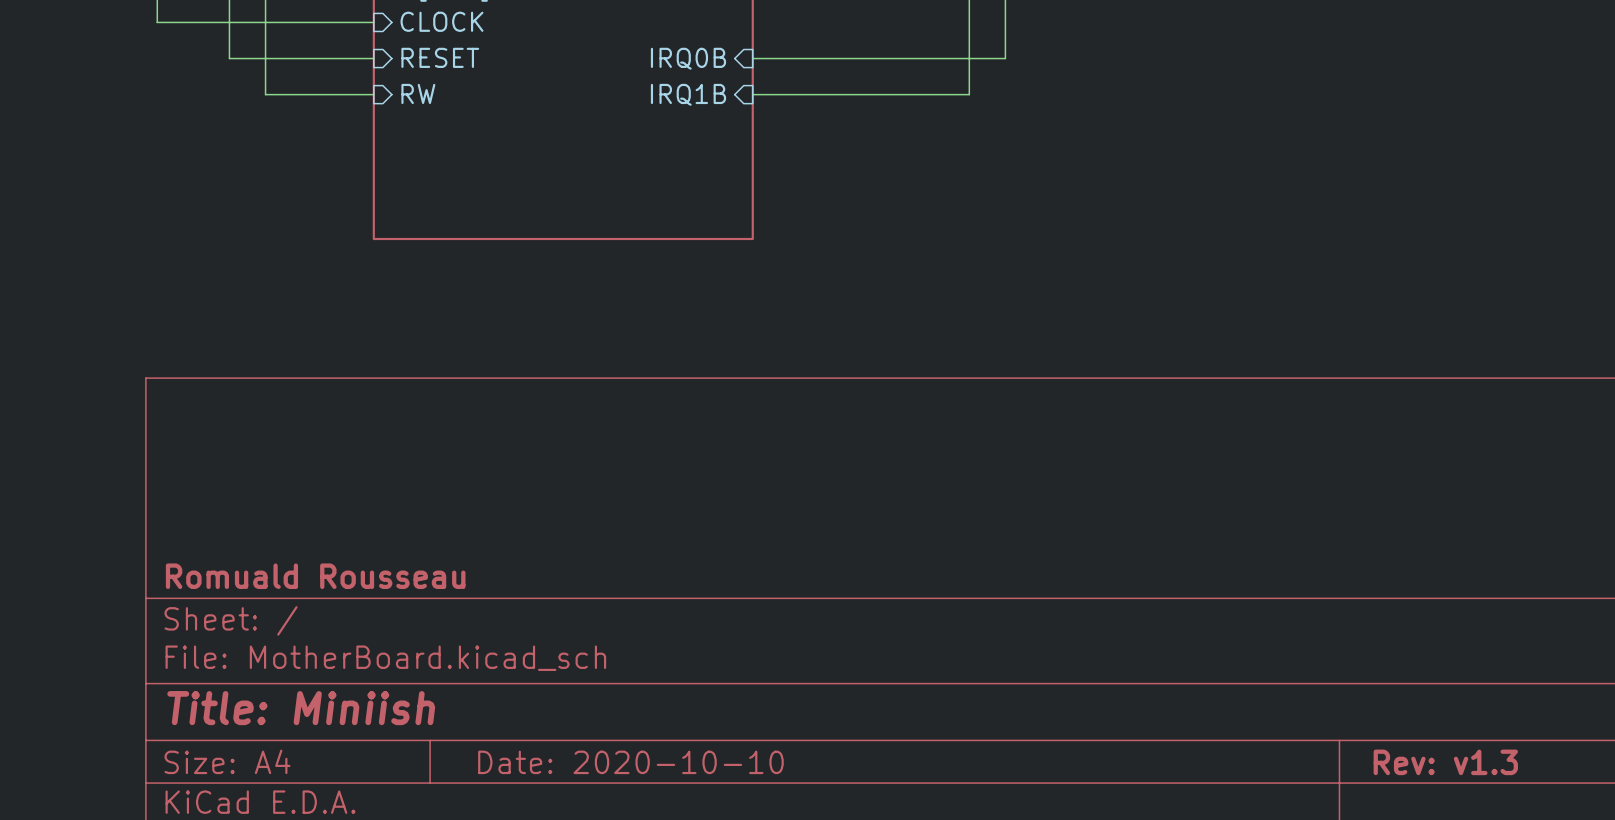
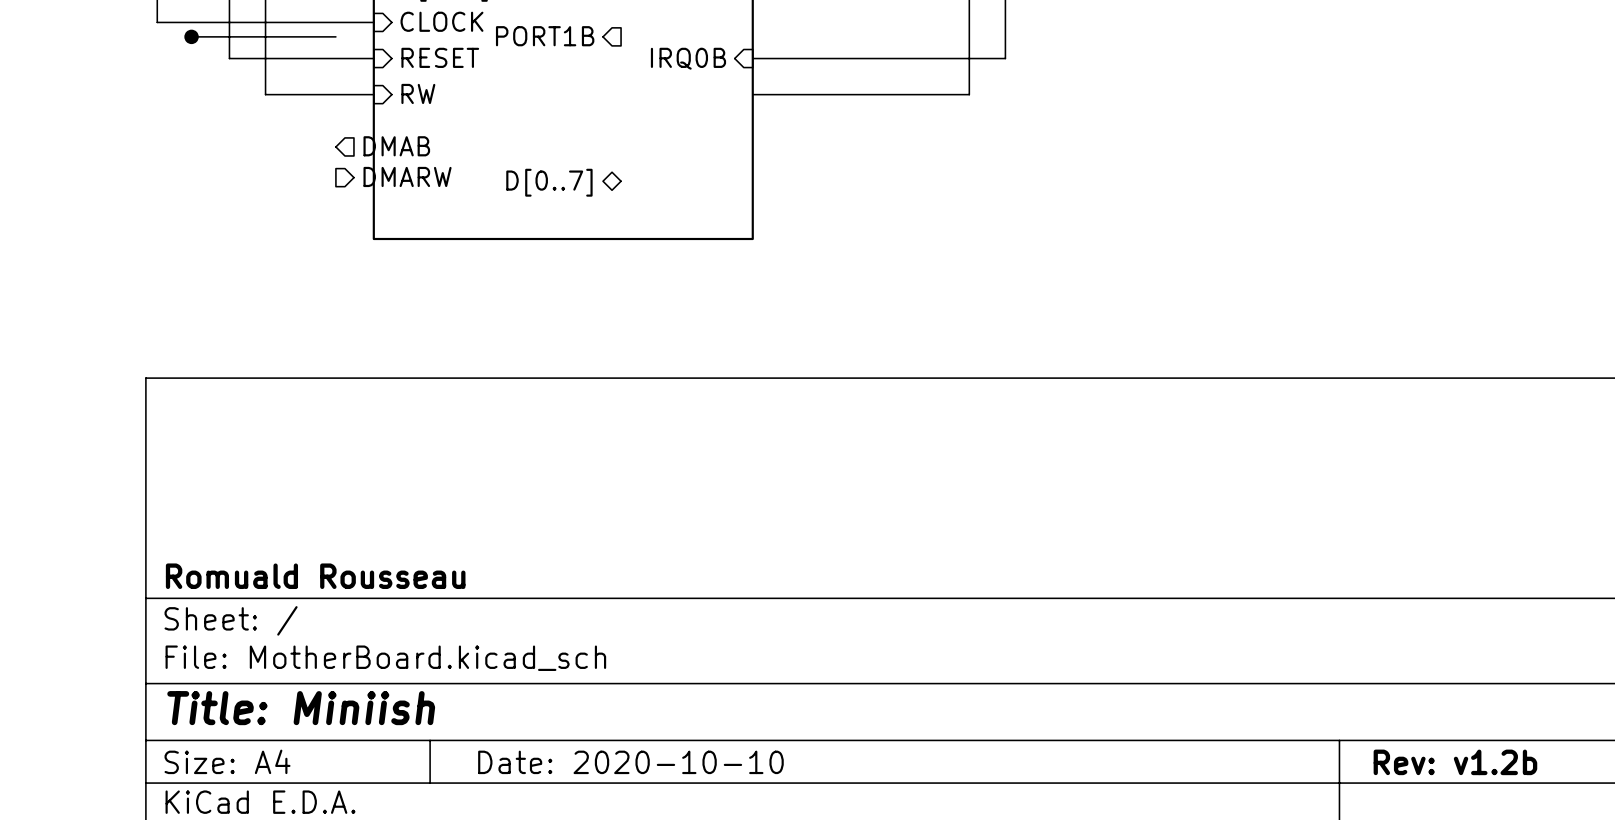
wire: none -> (191, 36) (335, 36)
junction: none -> (191, 36)
sheet pin: none -> PORT1B (545, 36)
sheet pin: IRQ1B (688, 94) -> none
sheet pin: none -> DMAB (396, 146)
sheet pin: none -> DMARW (407, 176)
sheet pin: none -> D[0..7] (549, 182)
title block: Rev: v1.3 (1445, 762) -> Rev: v1.2b (1455, 762)

